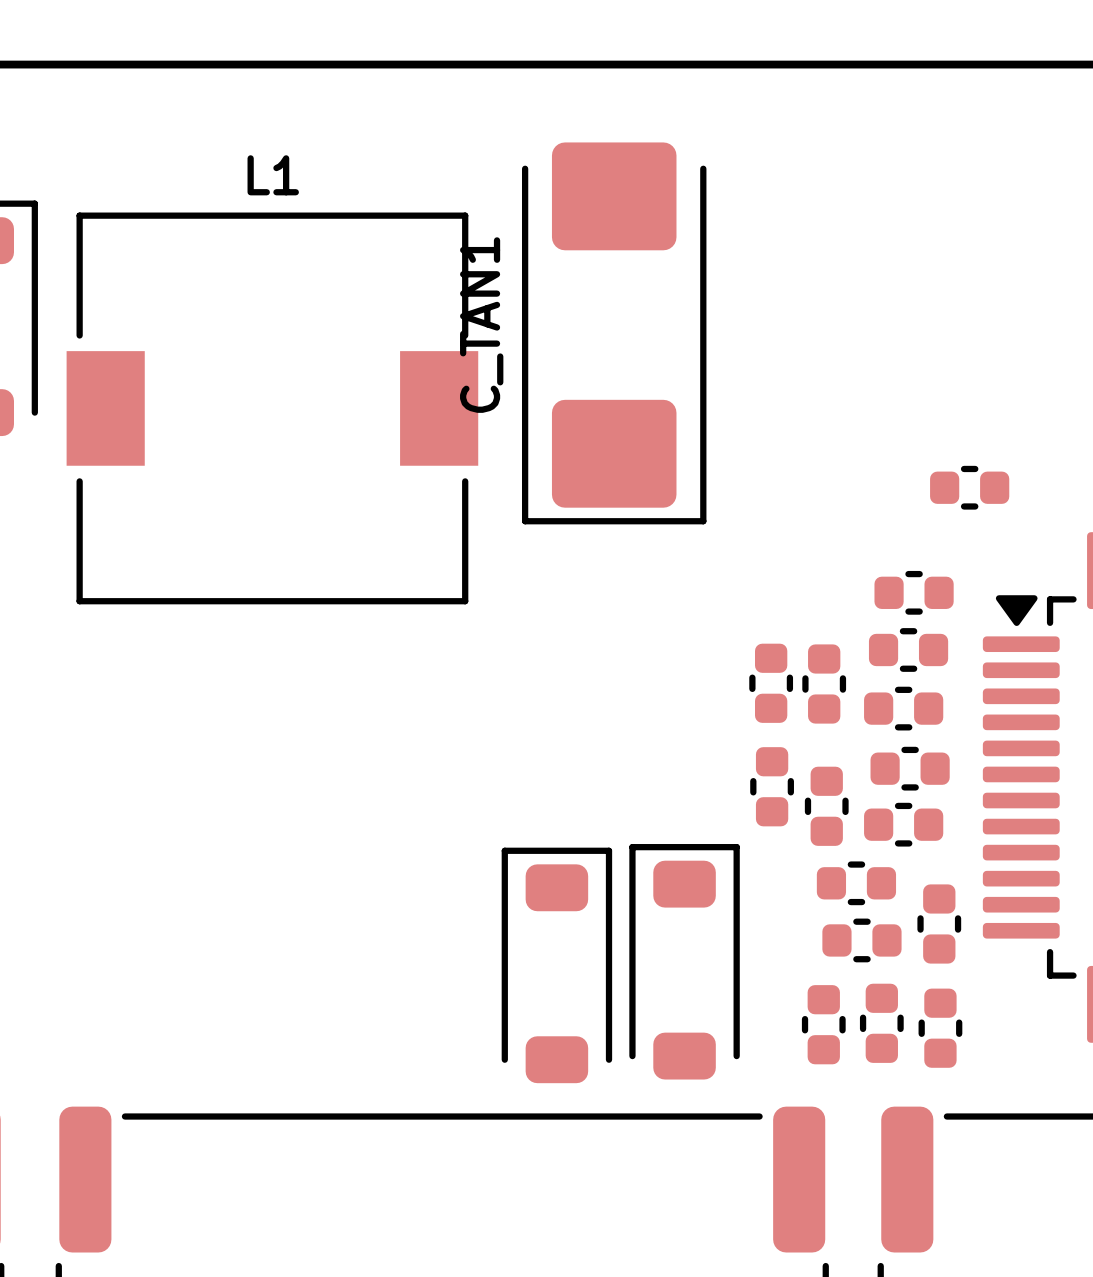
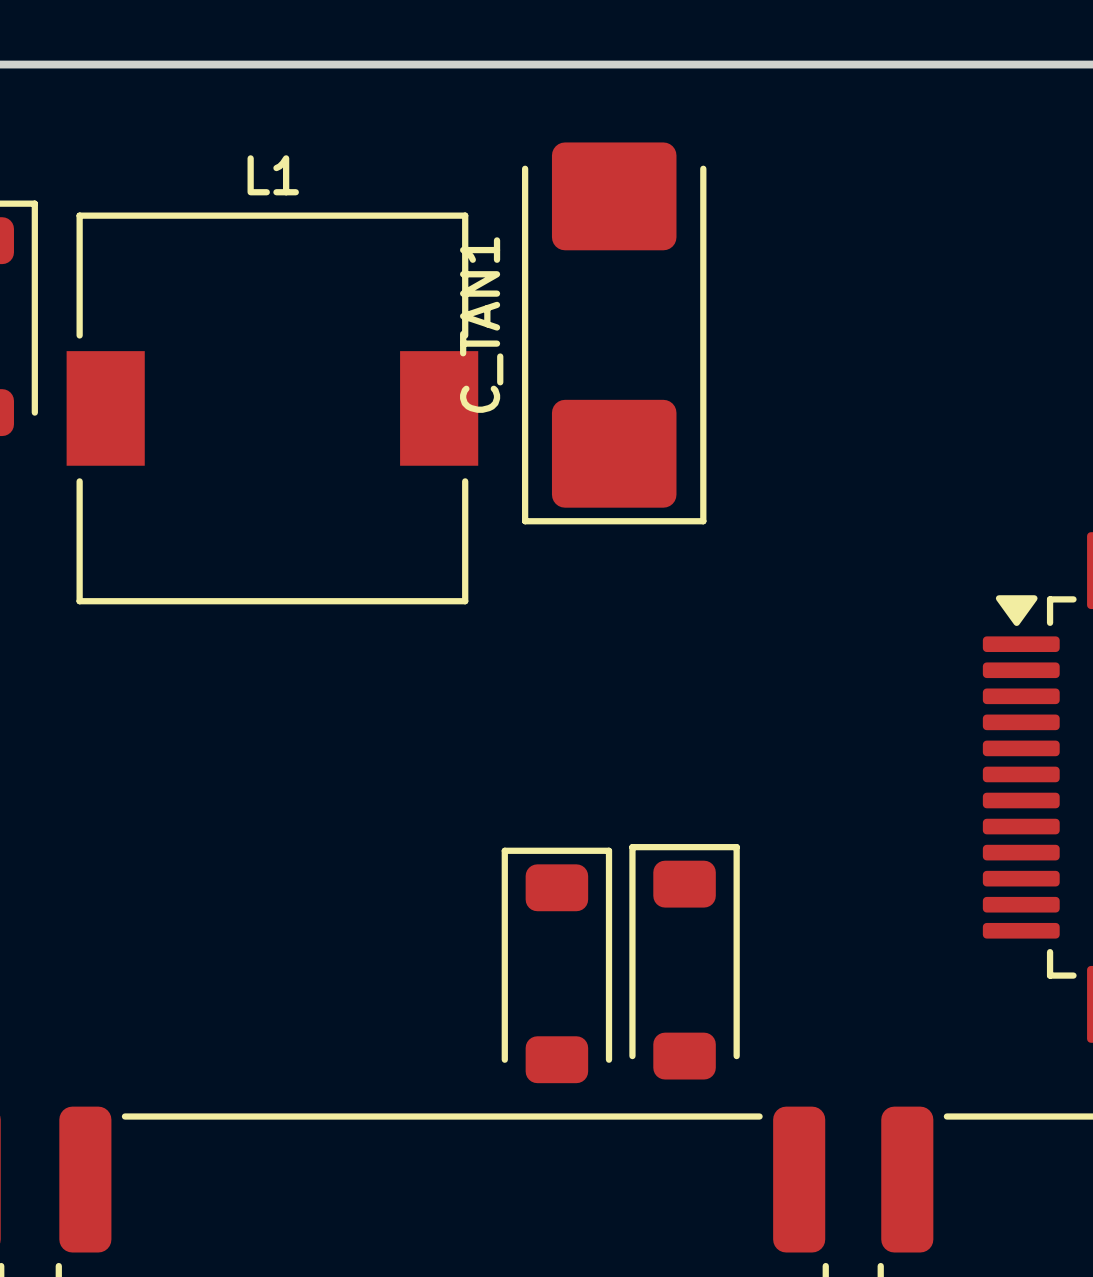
part: (969, 487) -> none
part: (914, 592) -> none
part: (908, 649) -> none
part: (771, 683) -> none
part: (824, 684) -> none
part: (903, 708) -> none
part: (910, 768) -> none
part: (772, 786) -> none
part: (826, 806) -> none
part: (903, 824) -> none
part: (856, 883) -> none
part: (939, 923) -> none
part: (861, 940) -> none
part: (881, 1023) -> none
part: (823, 1024) -> none
part: (940, 1028) -> none

